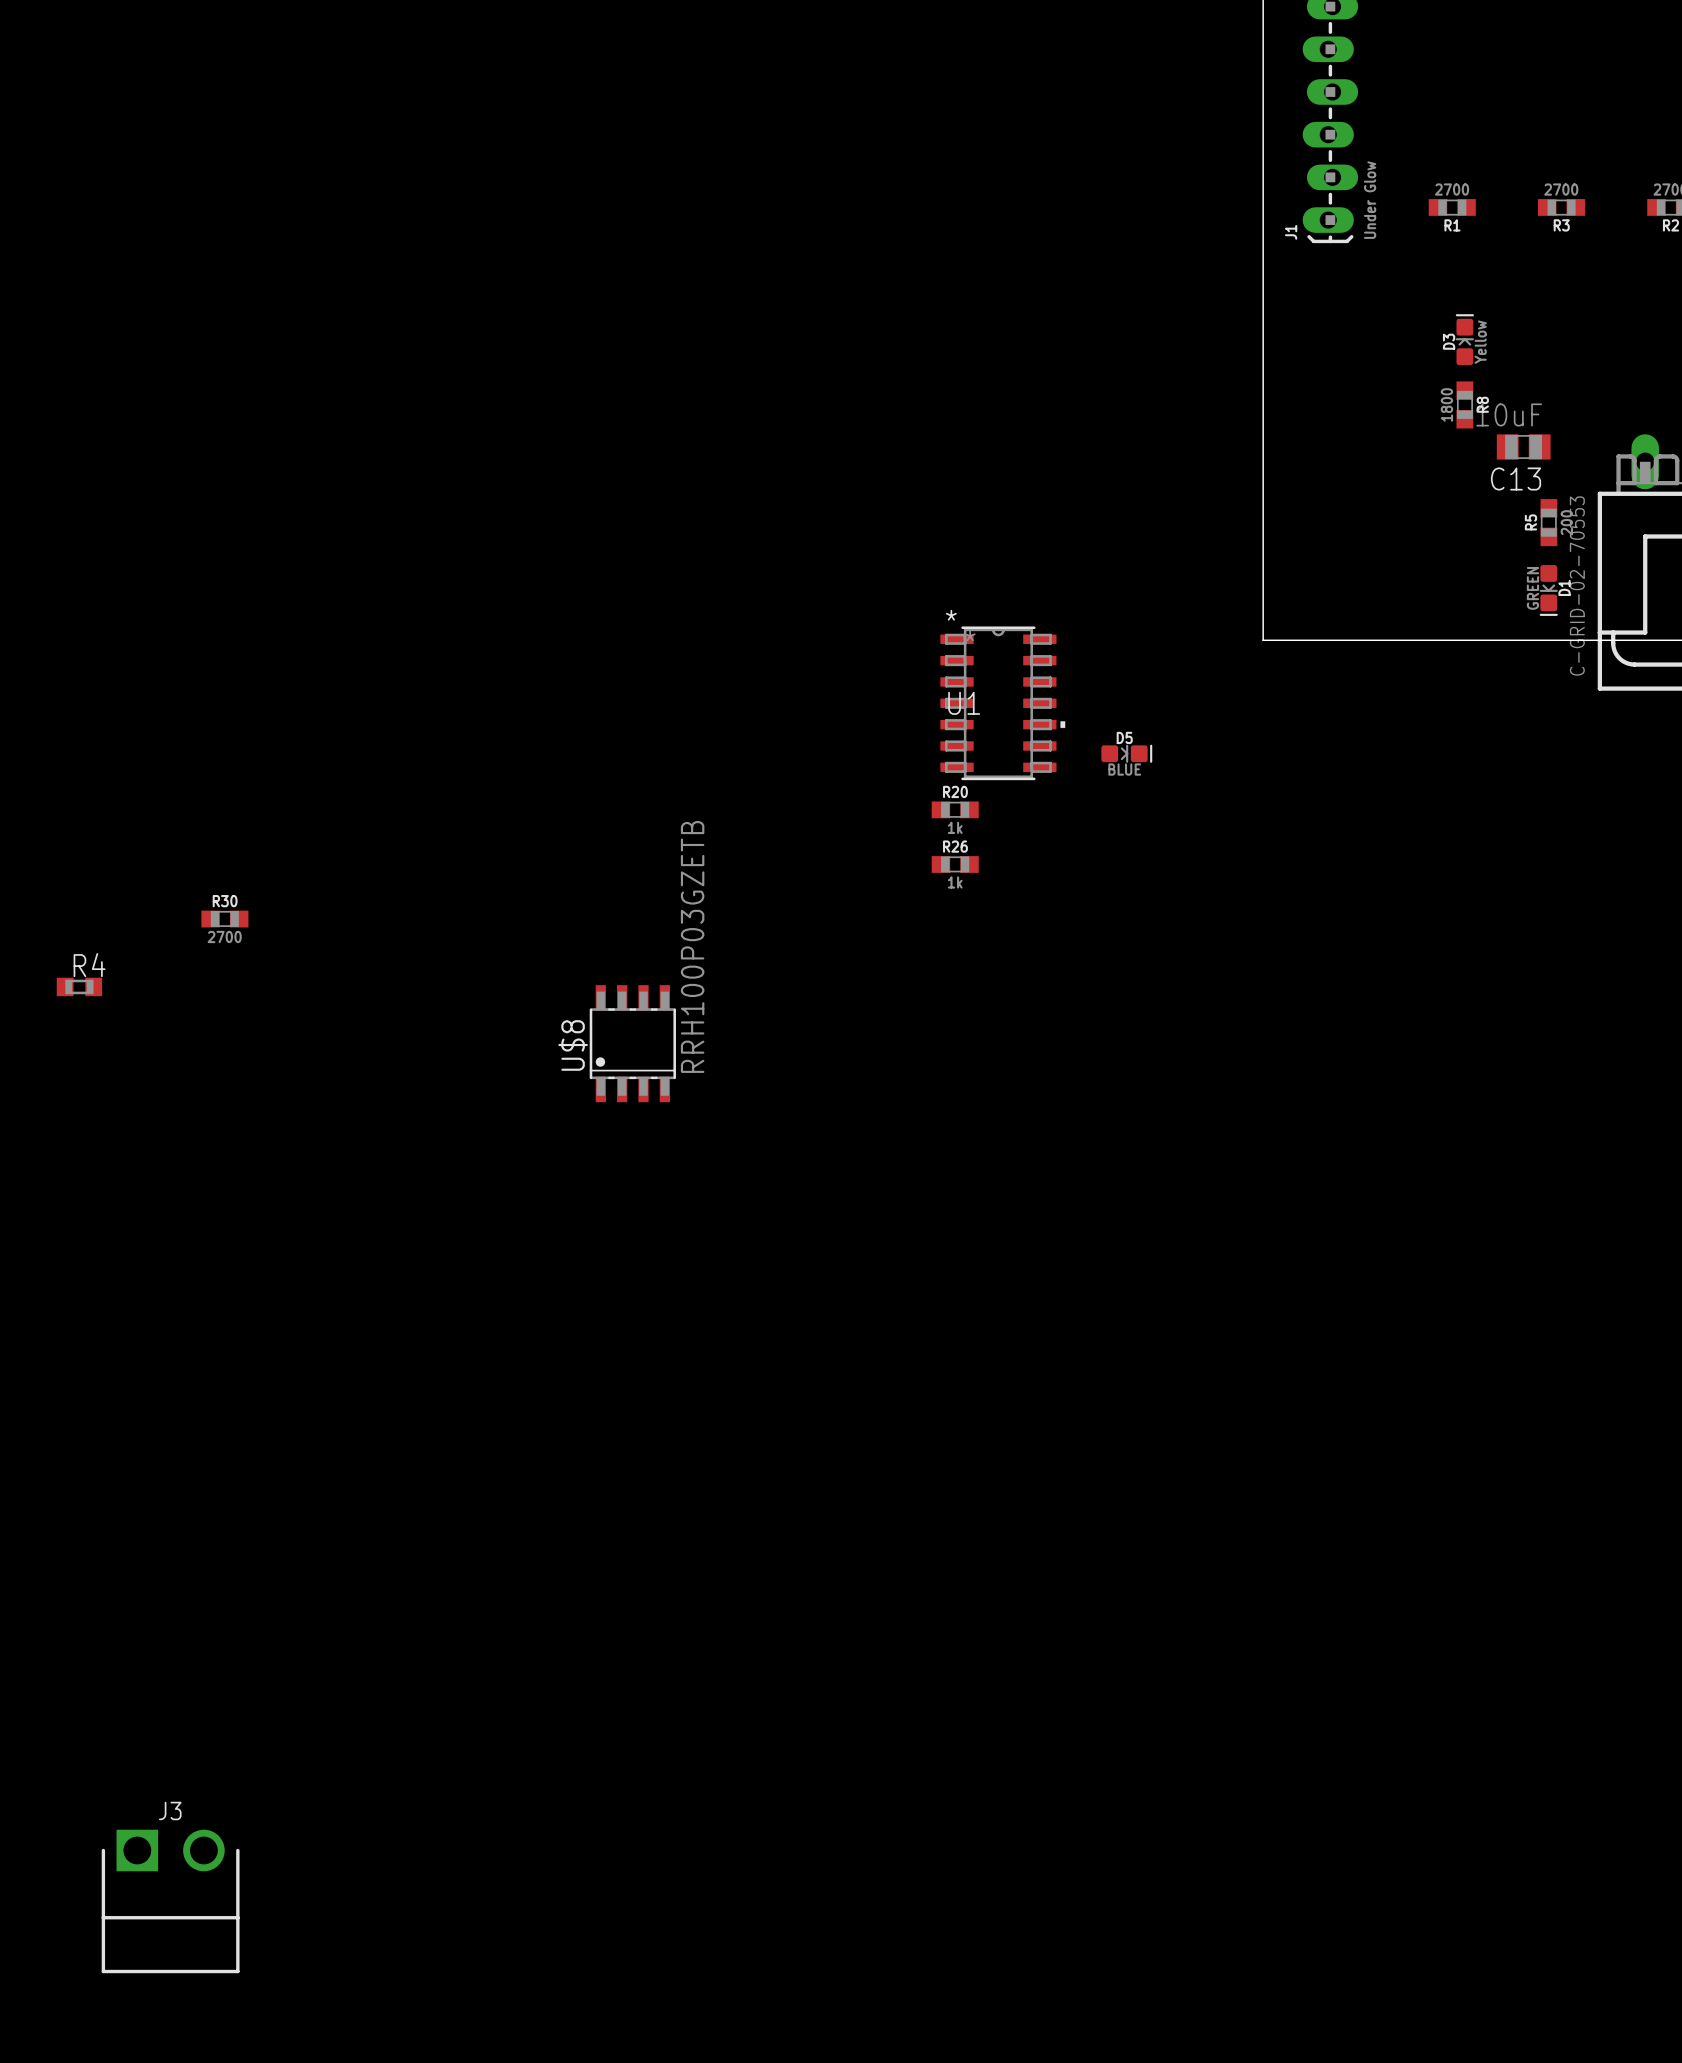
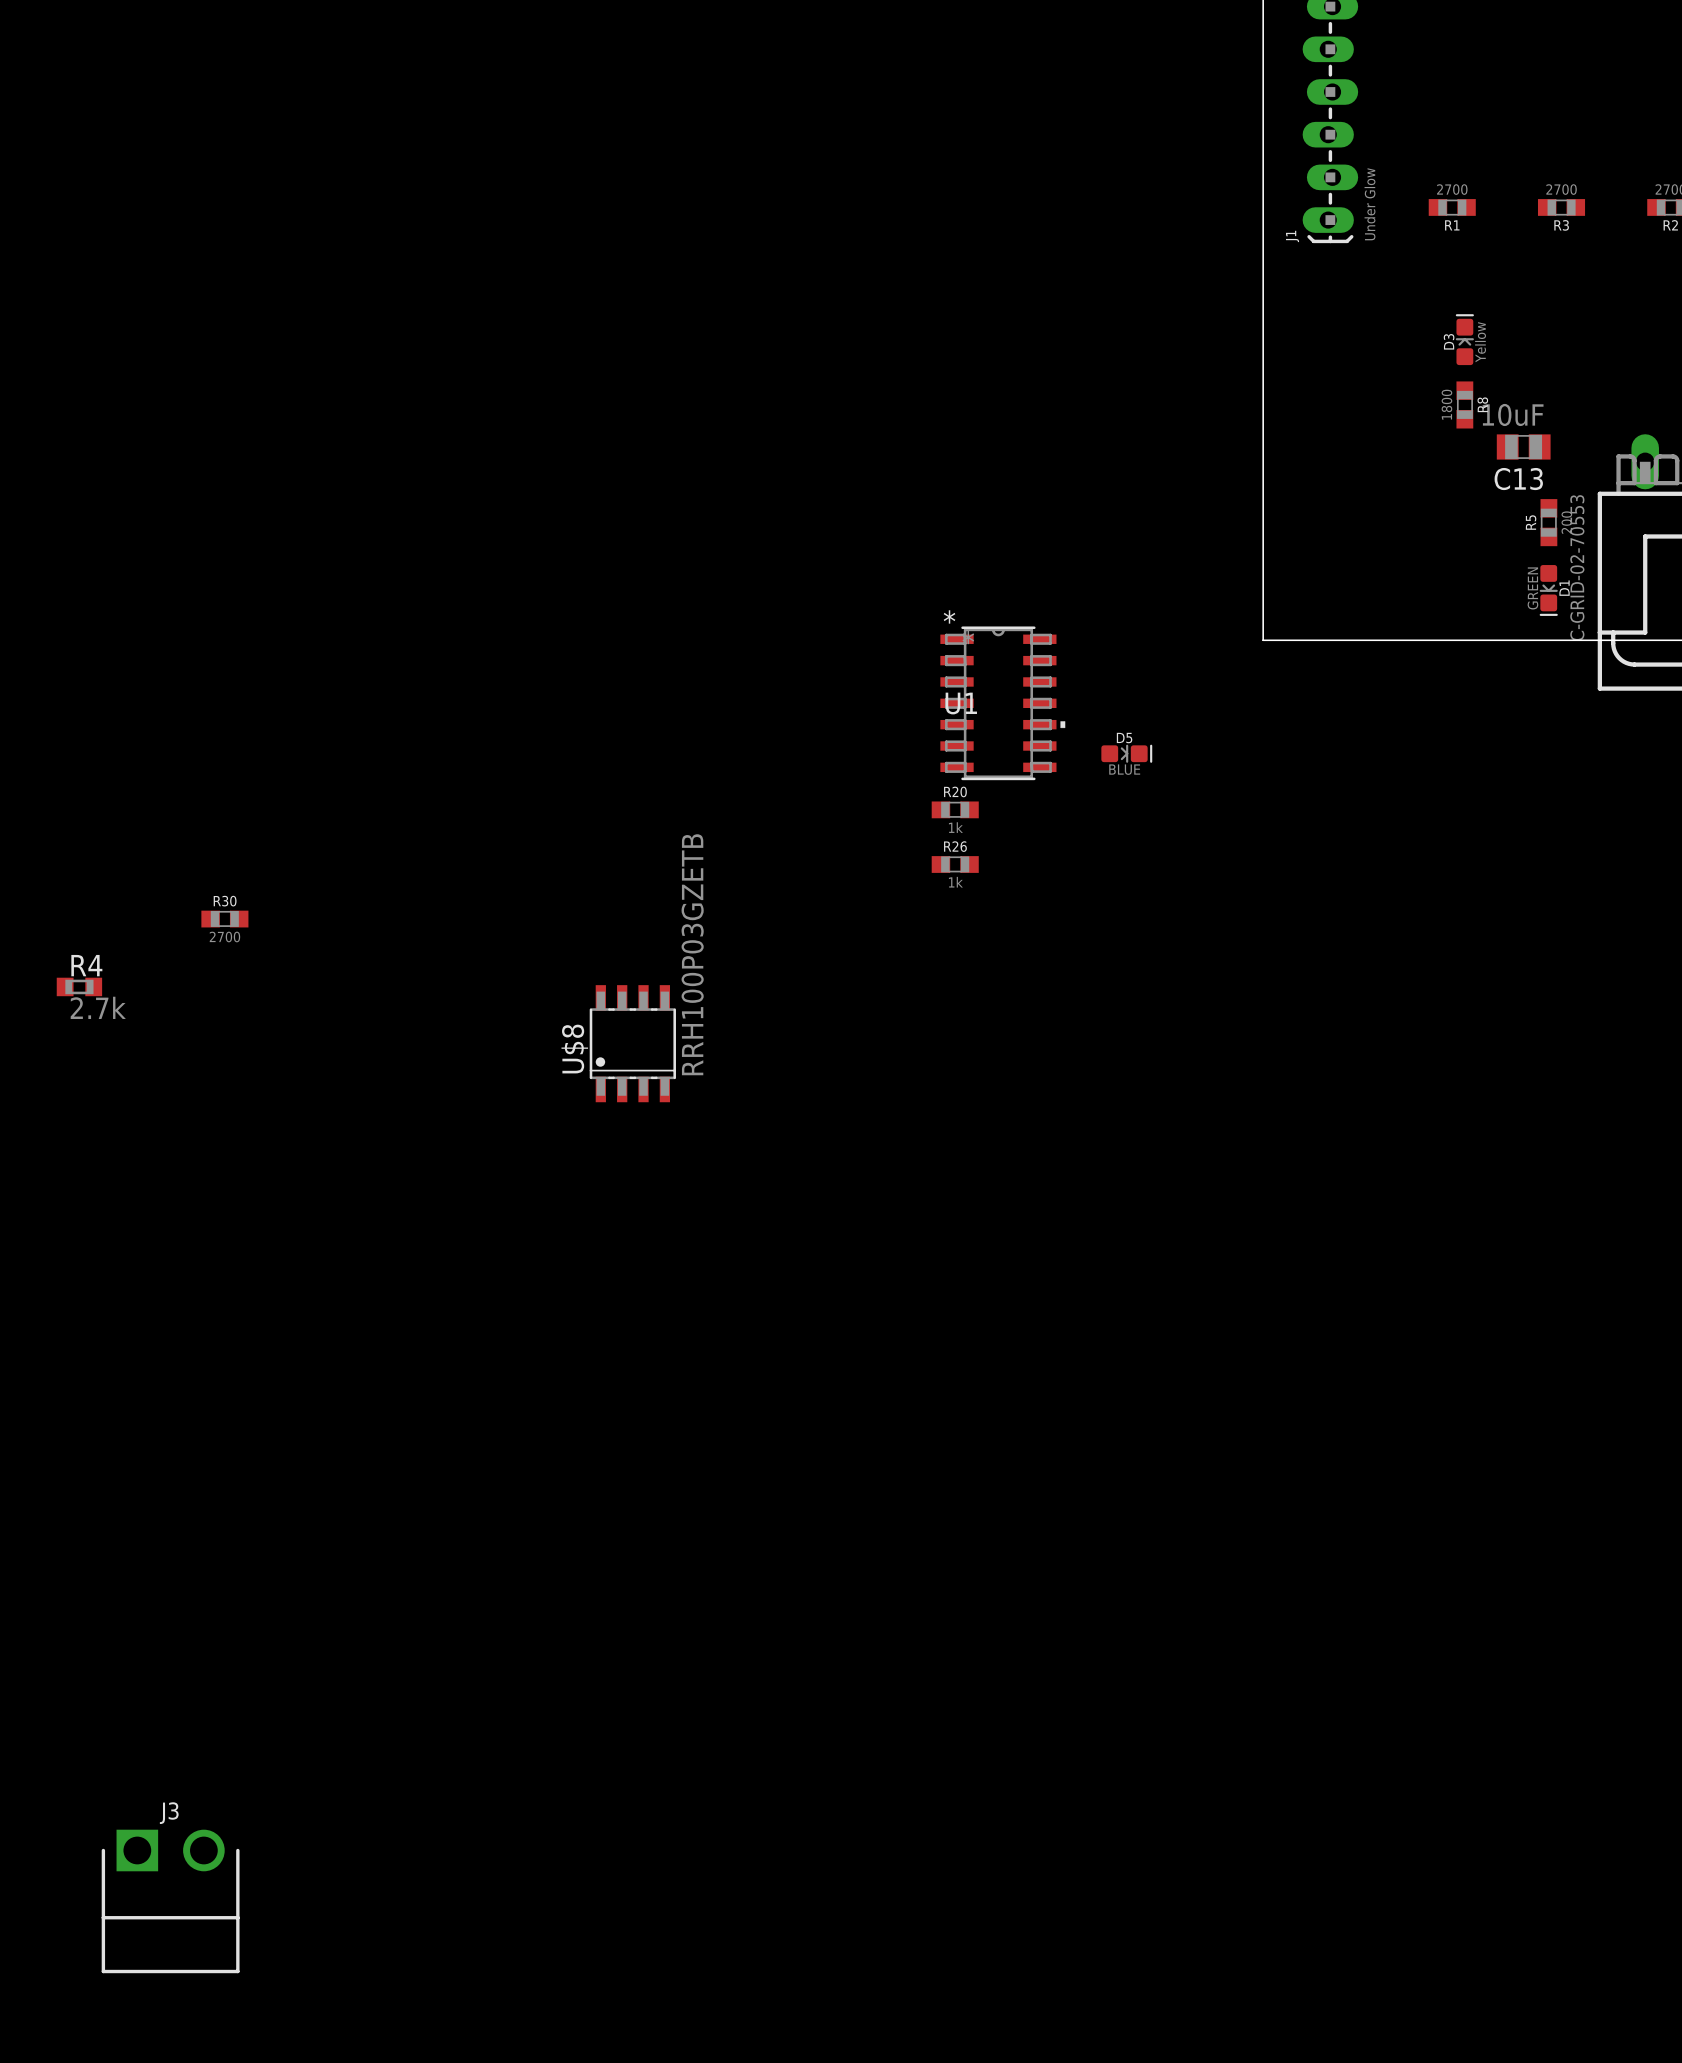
R4 value: none -> 2.7k (98, 1007)

